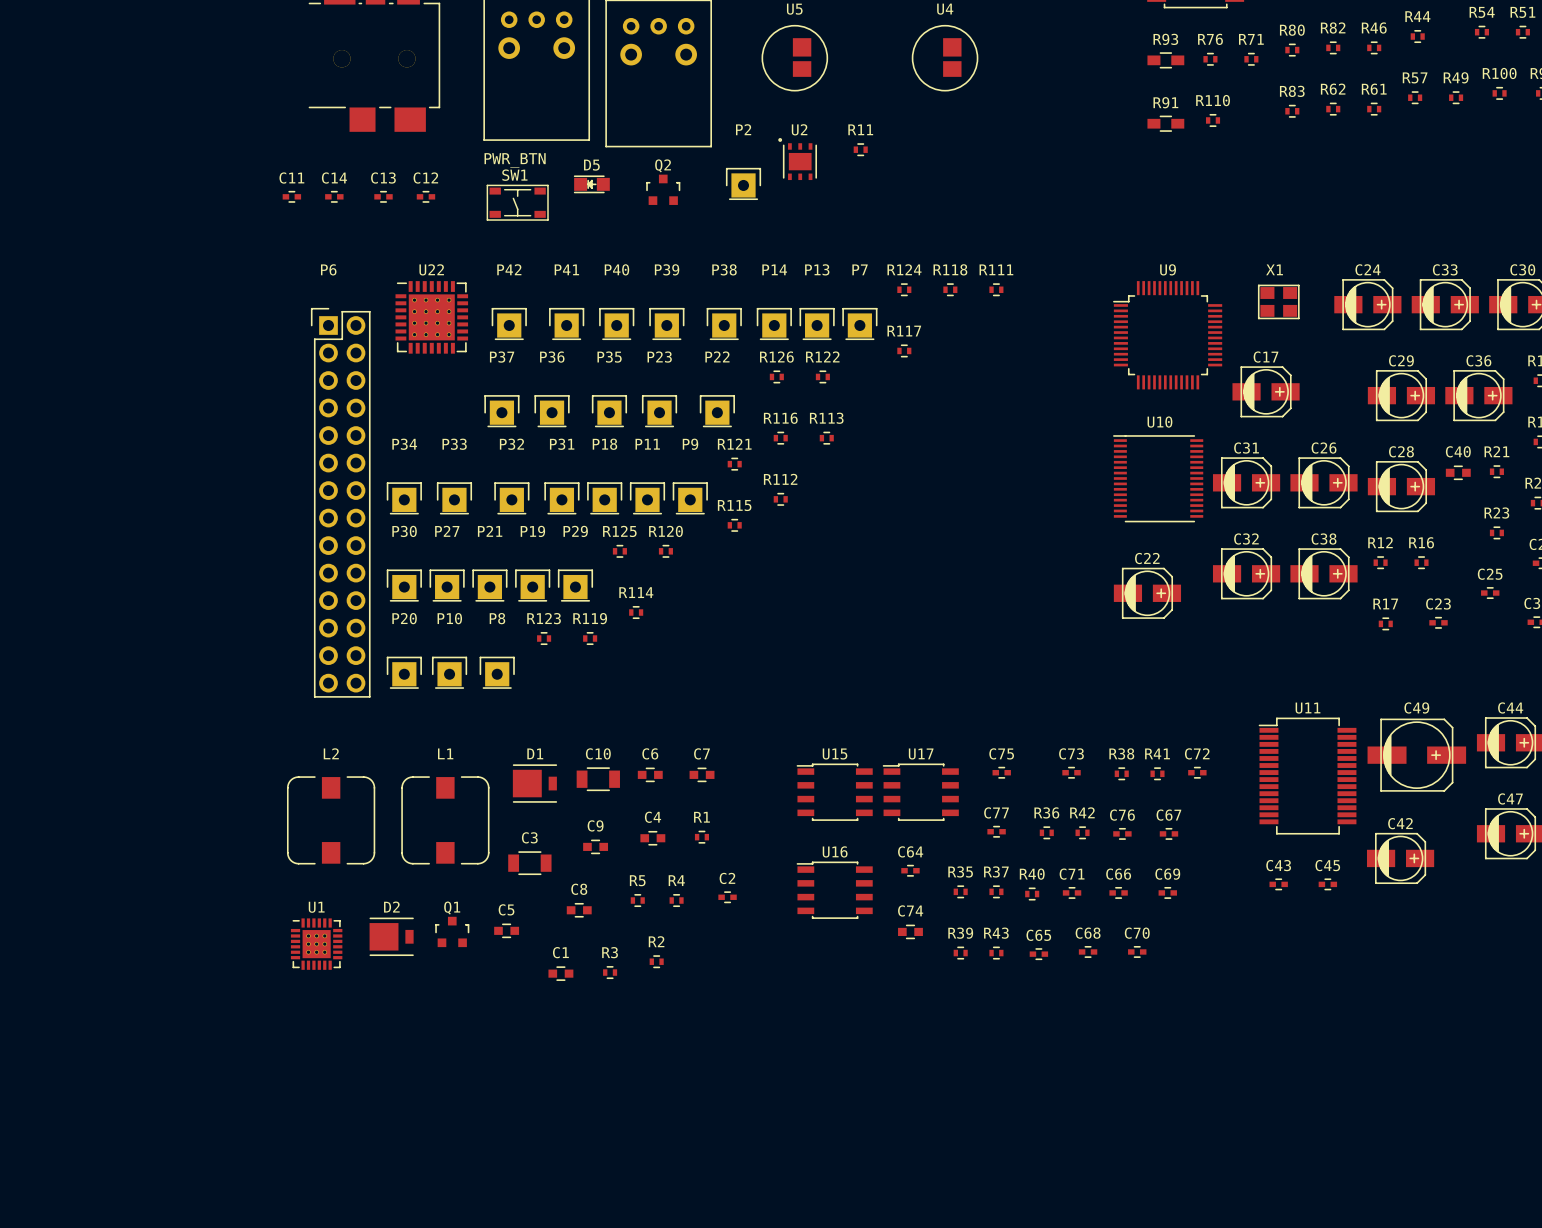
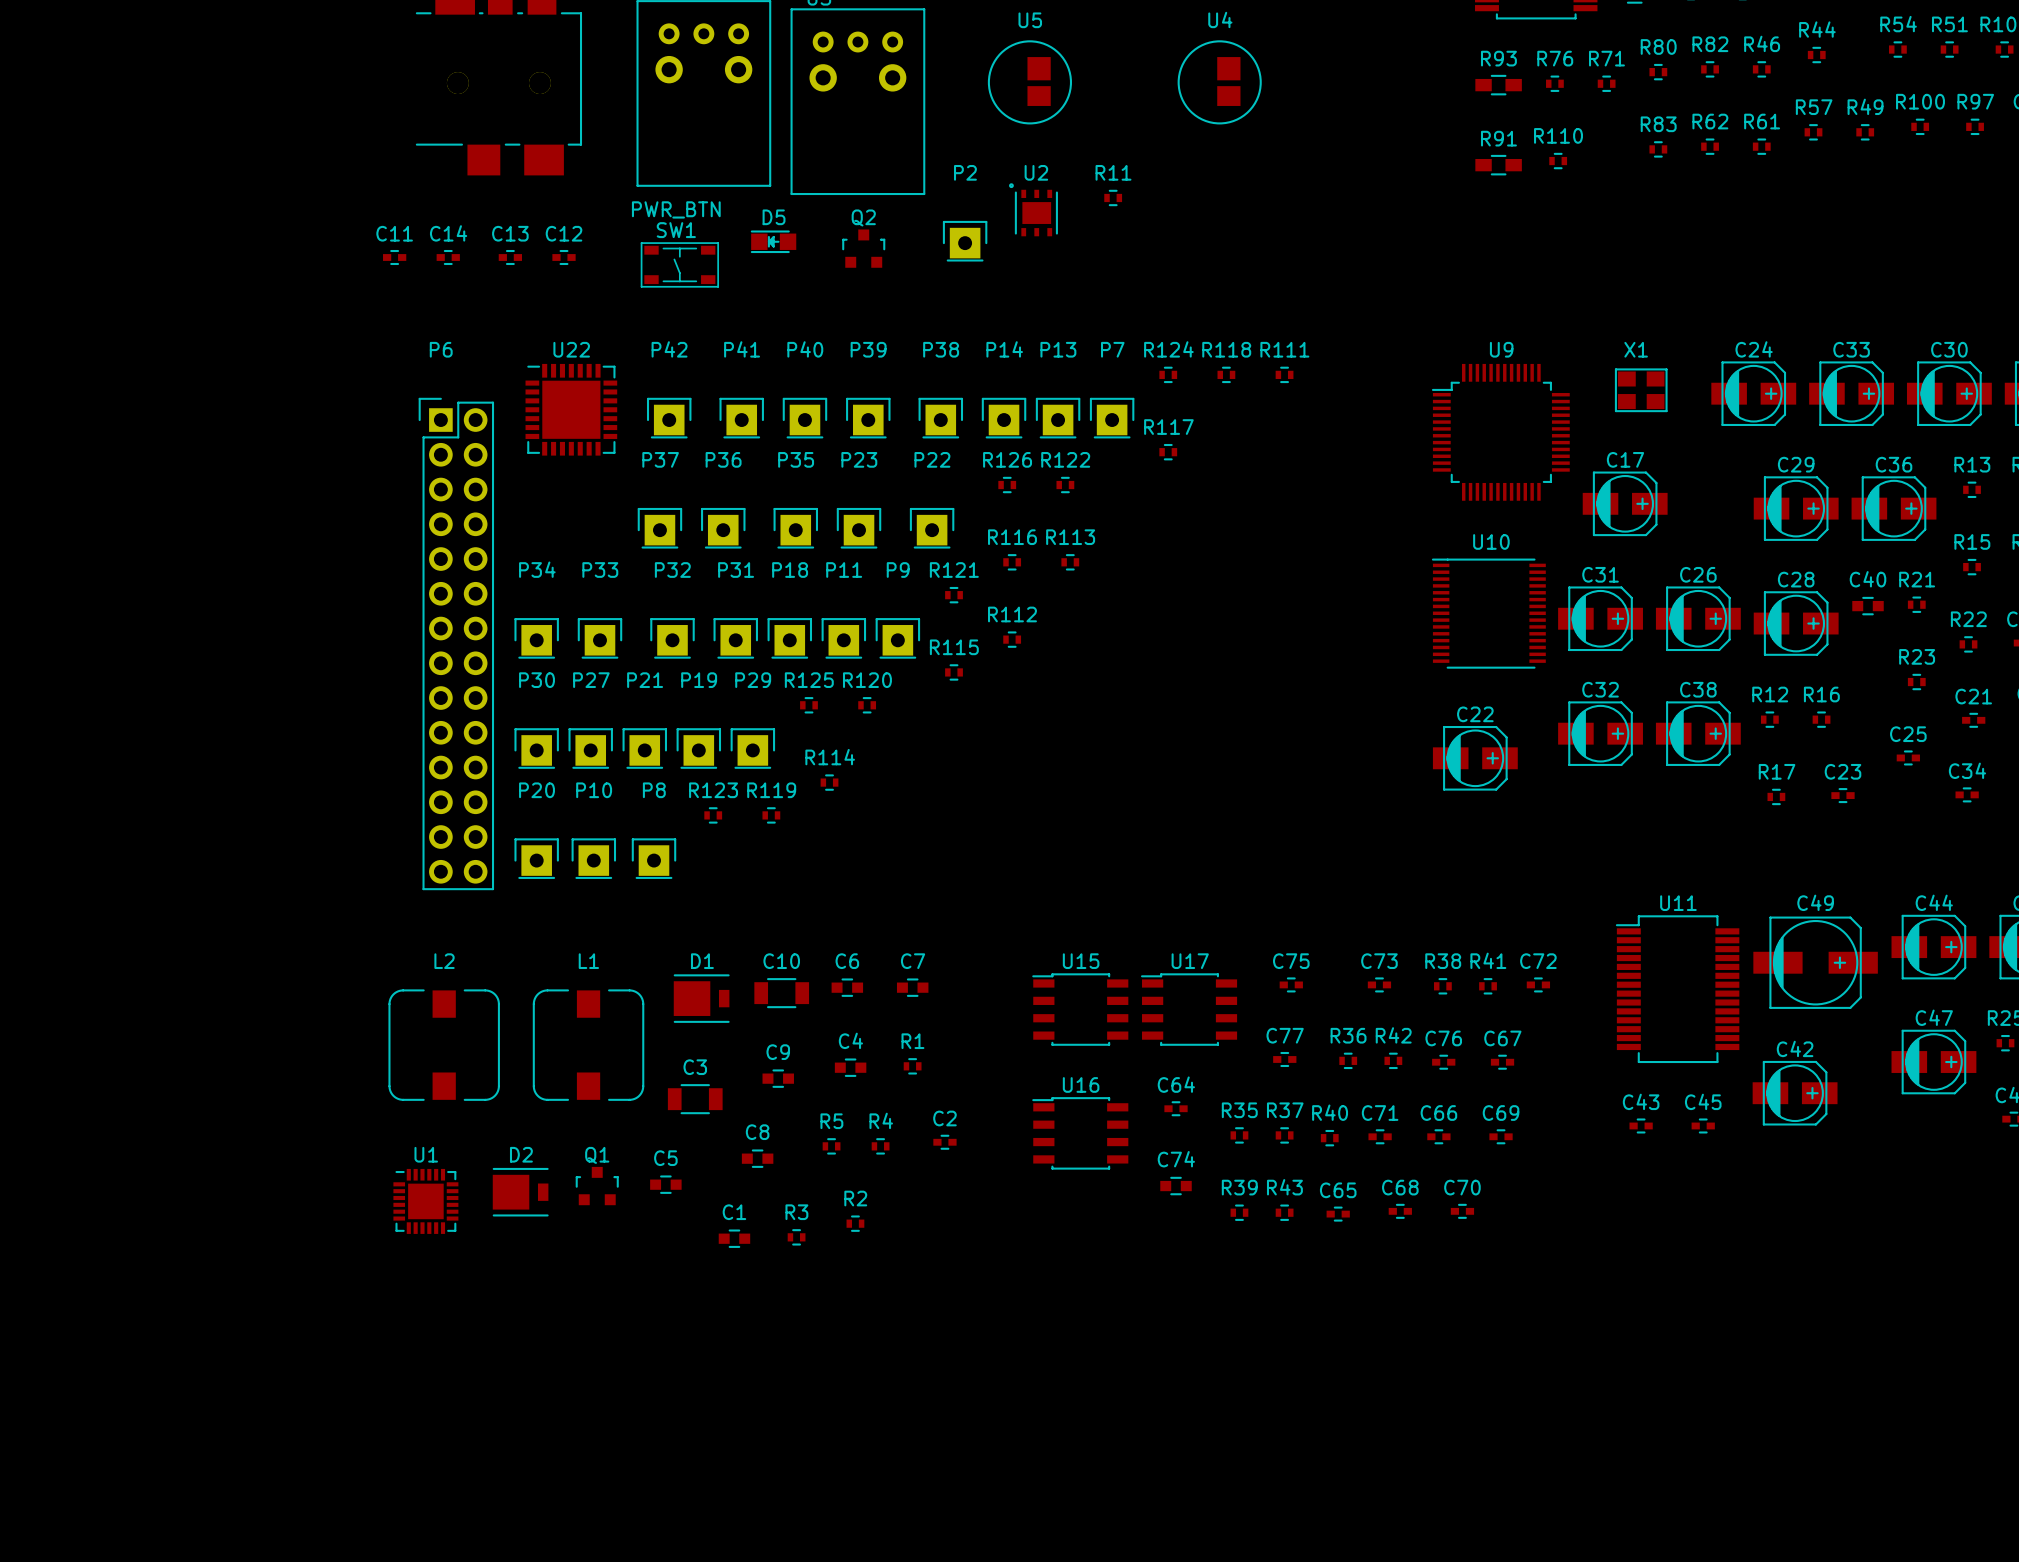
U22 footprint: [395, 281, 469, 354] -> [525, 363, 618, 456]
U1 footprint: [290, 918, 343, 970] -> [393, 1168, 459, 1234]

